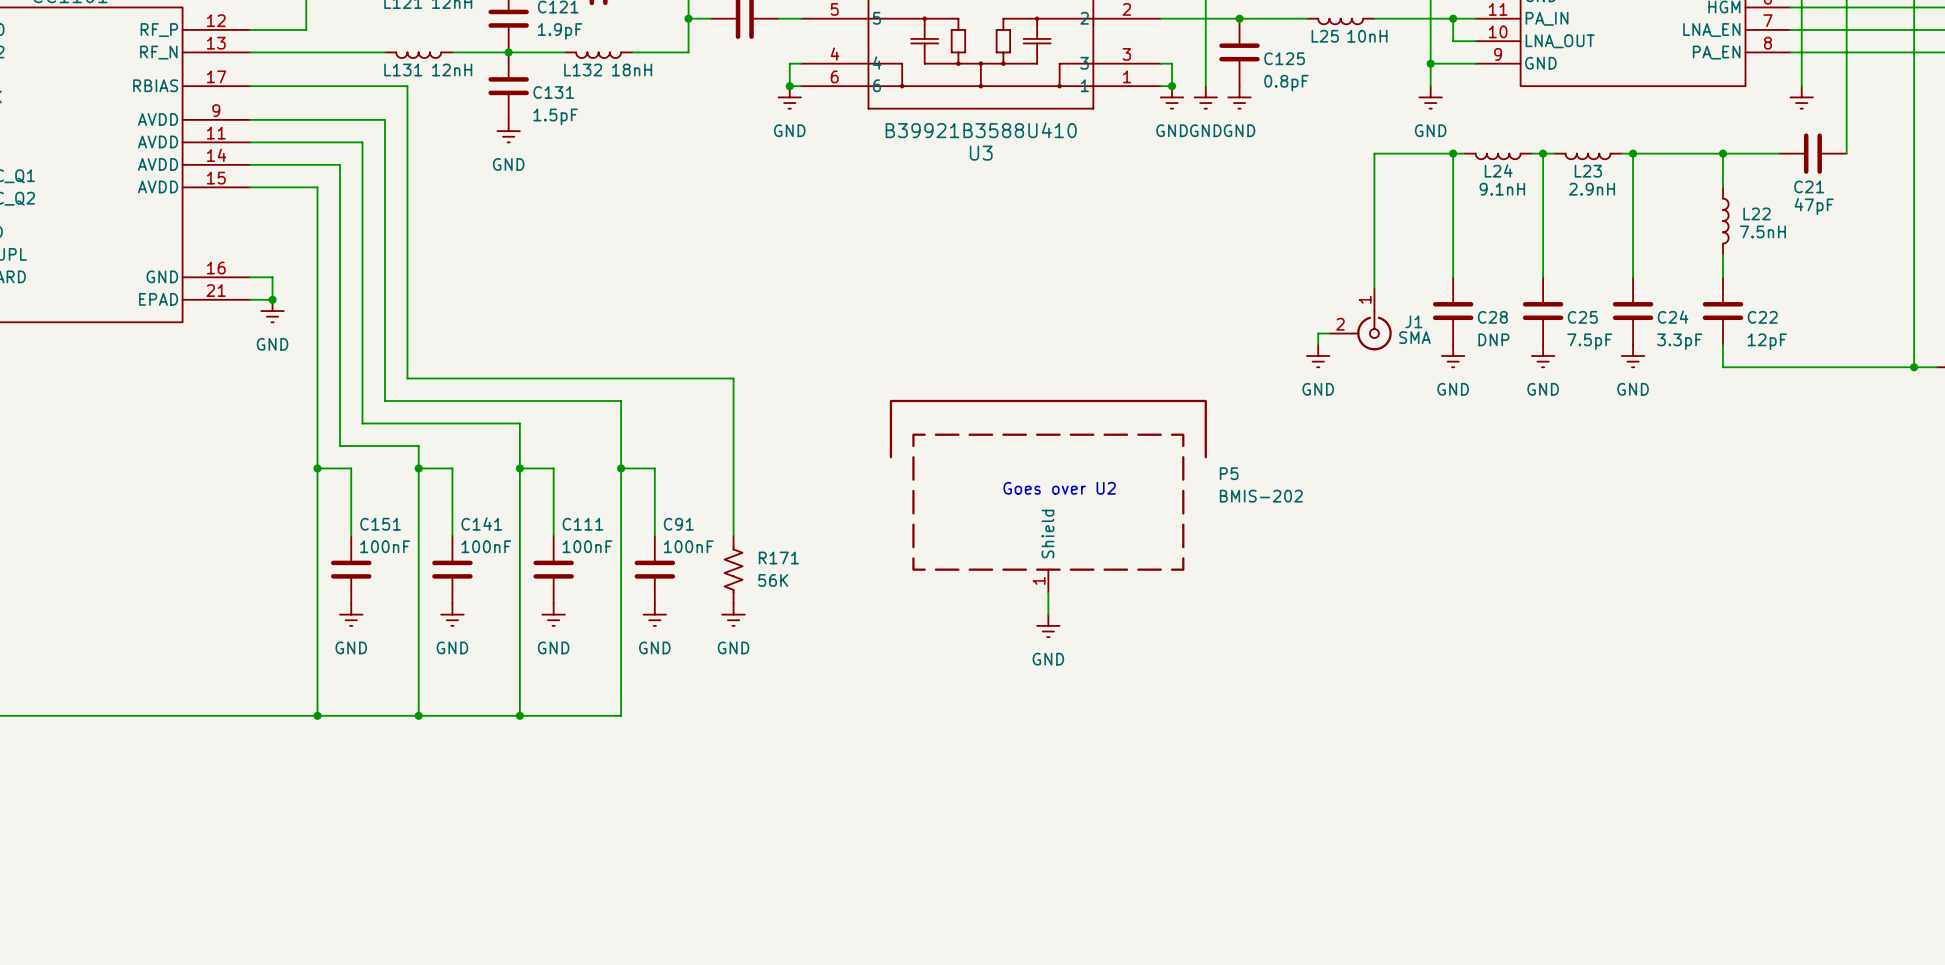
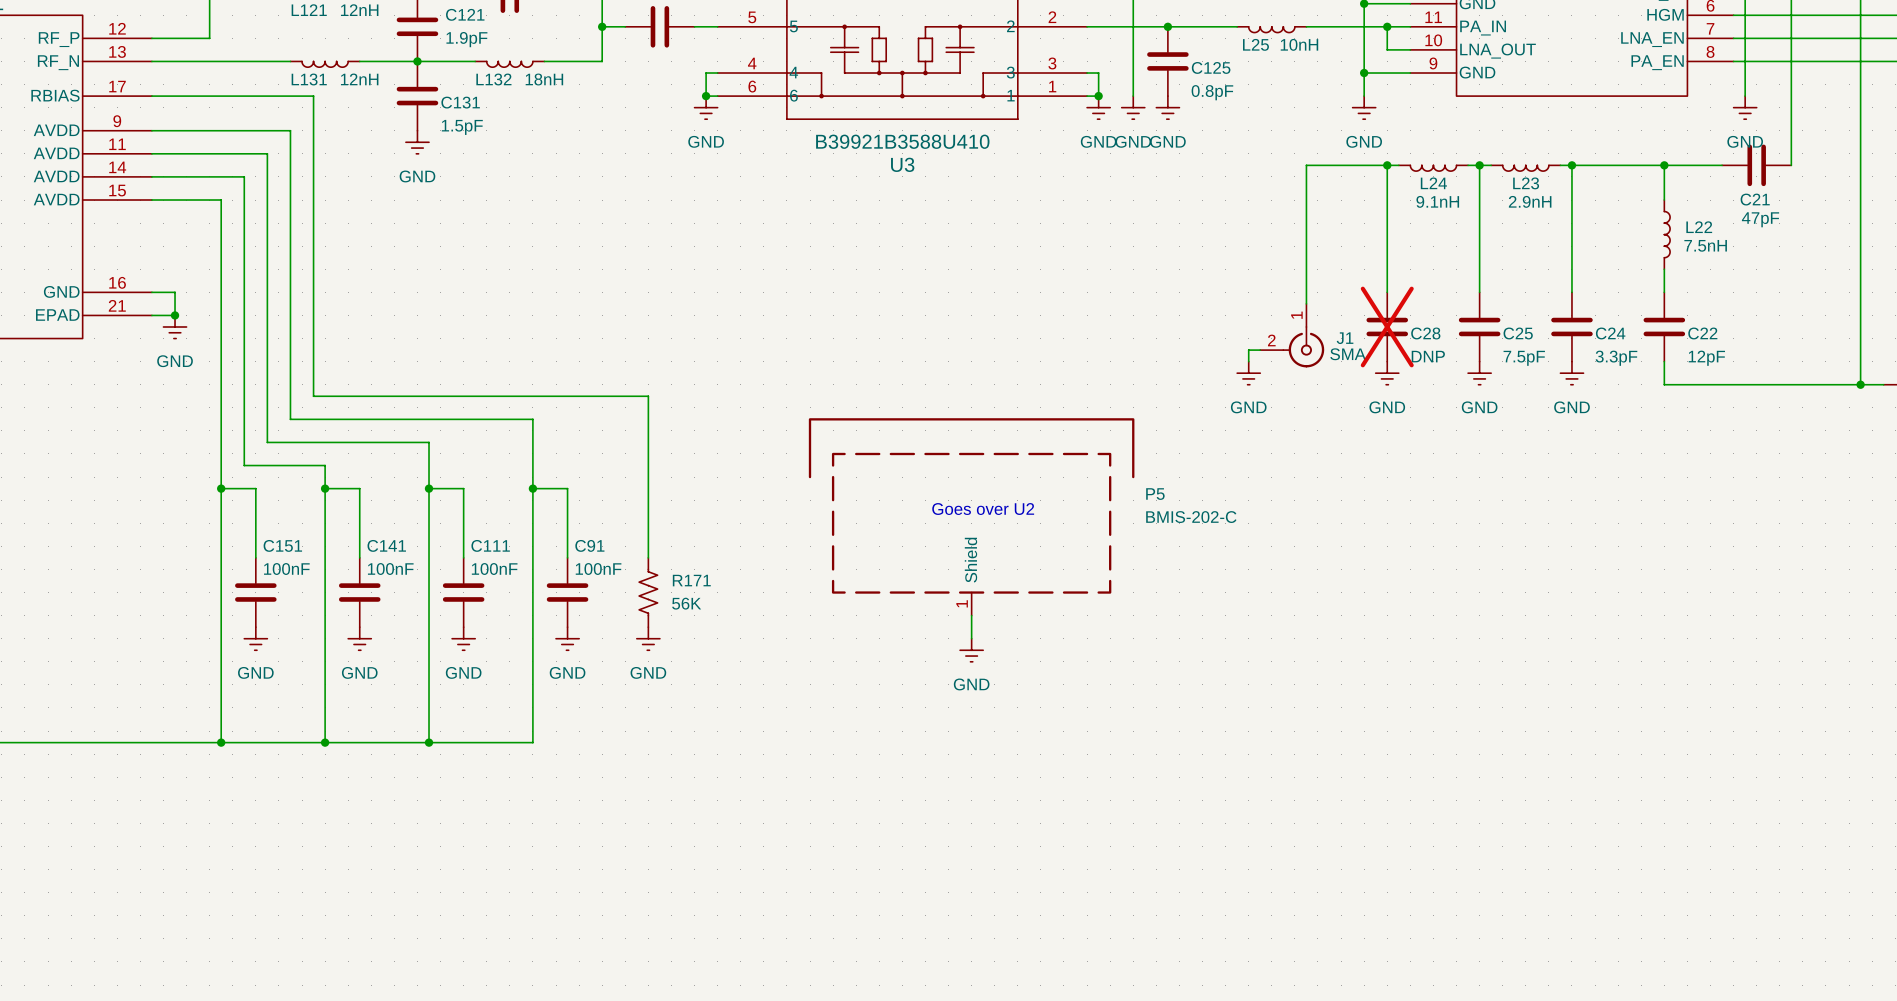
power symbol text: none -> GND (1745, 141)
C28 do-not-place cross: none -> (1387, 327)
P5 value: BMIS-202 (1261, 496) -> BMIS-202-C (1191, 517)

